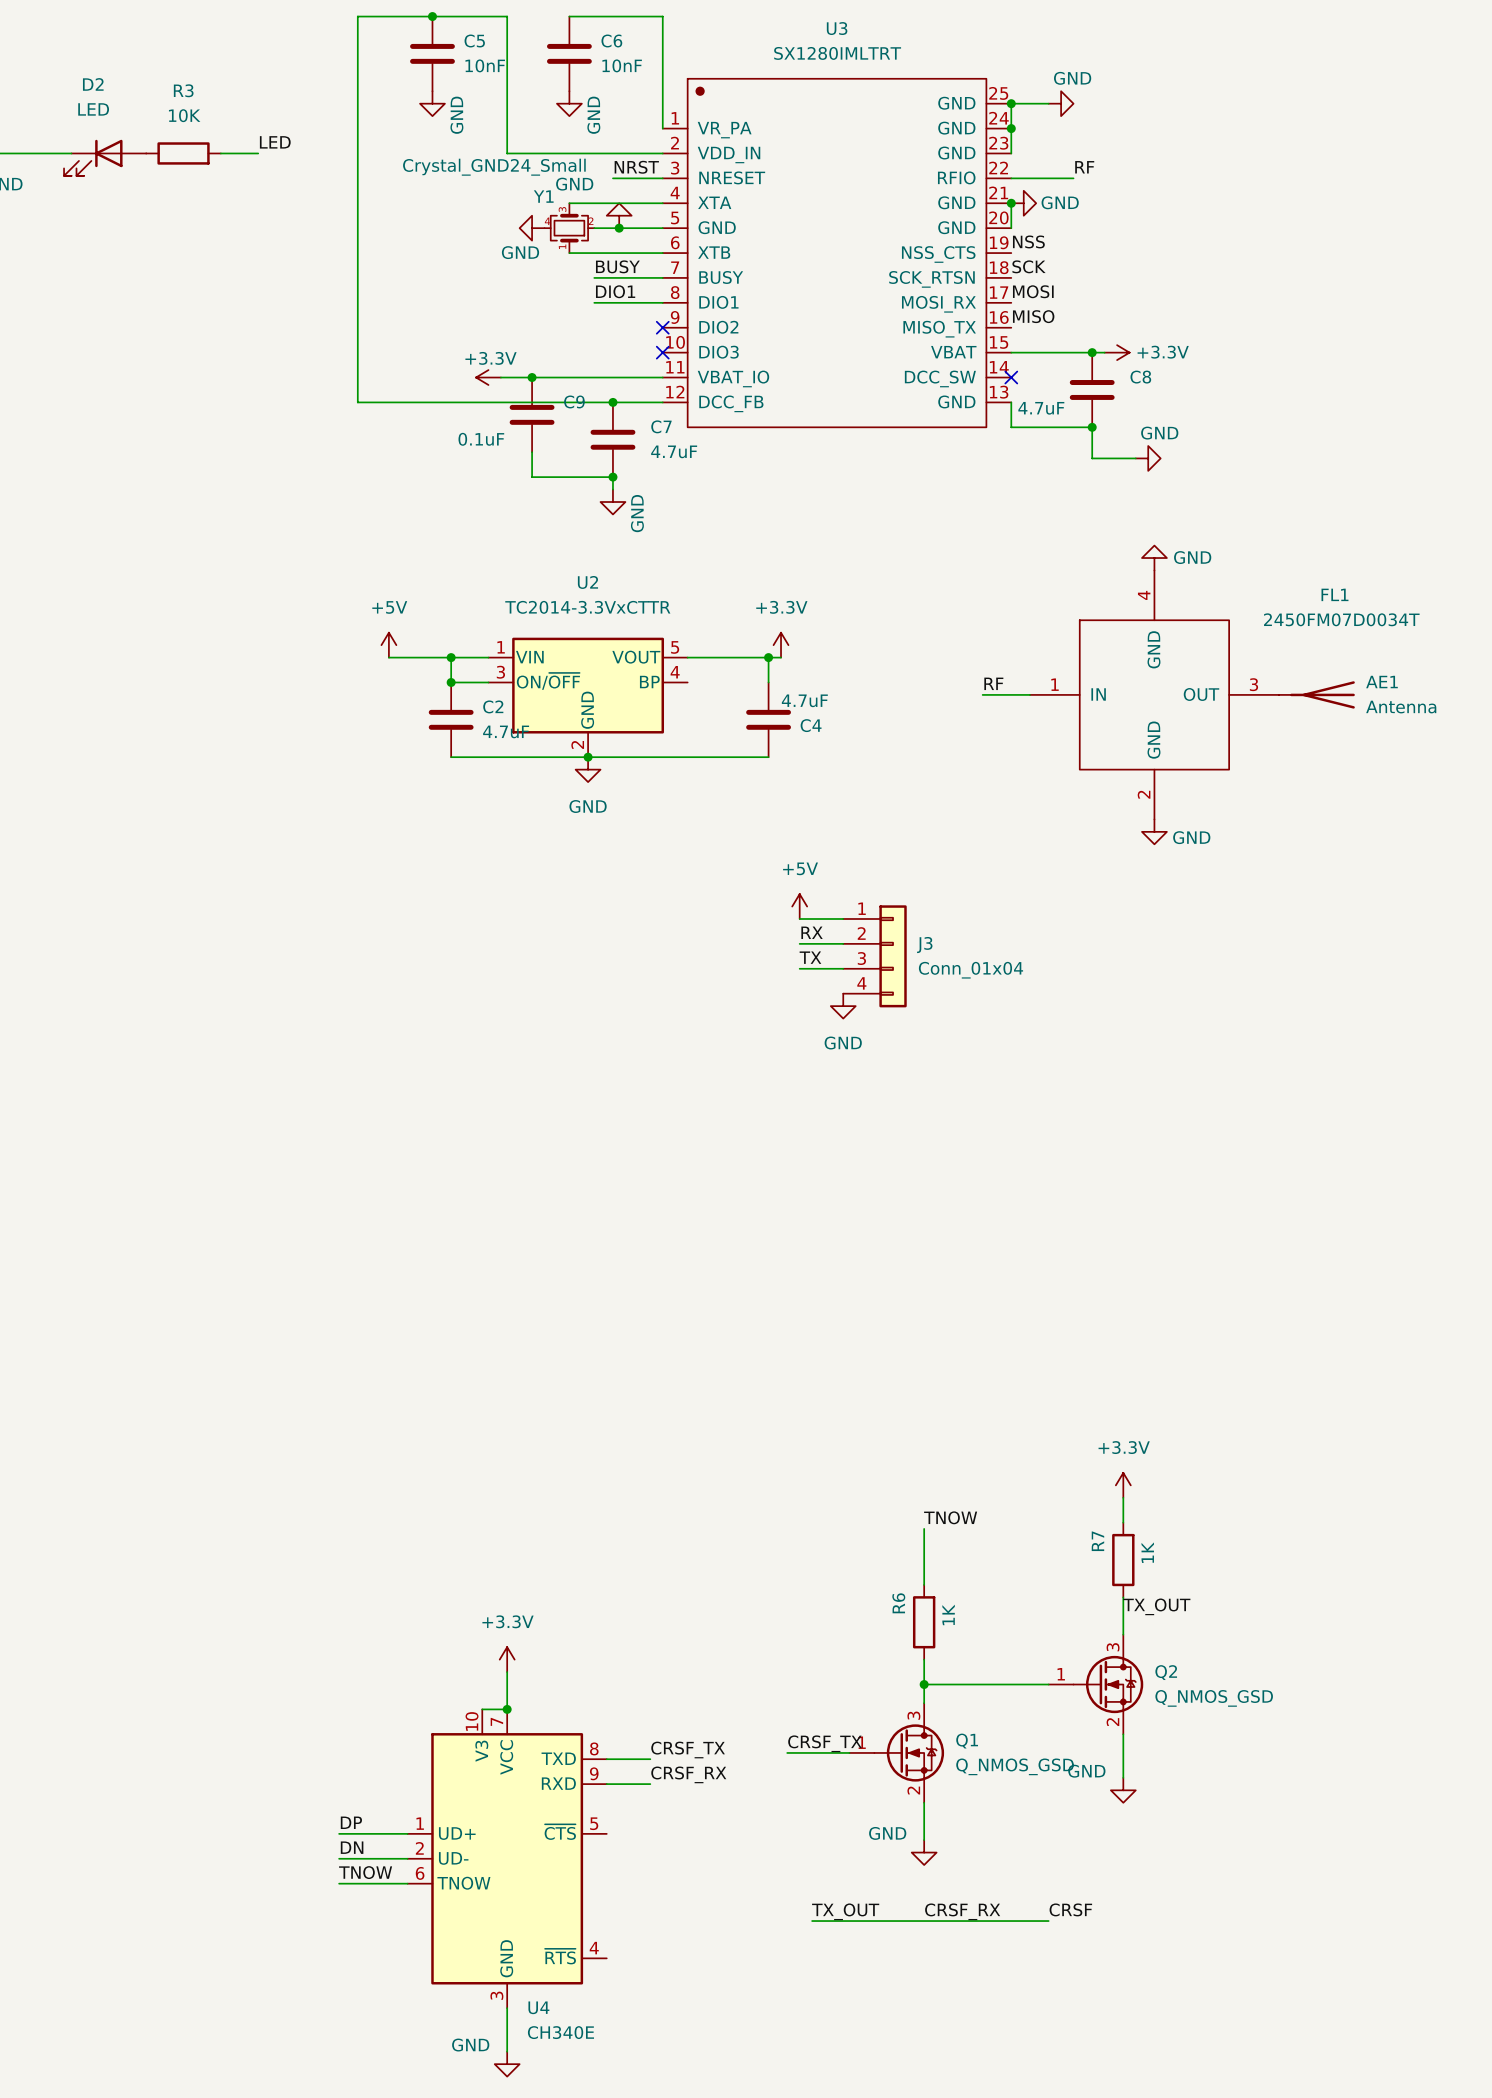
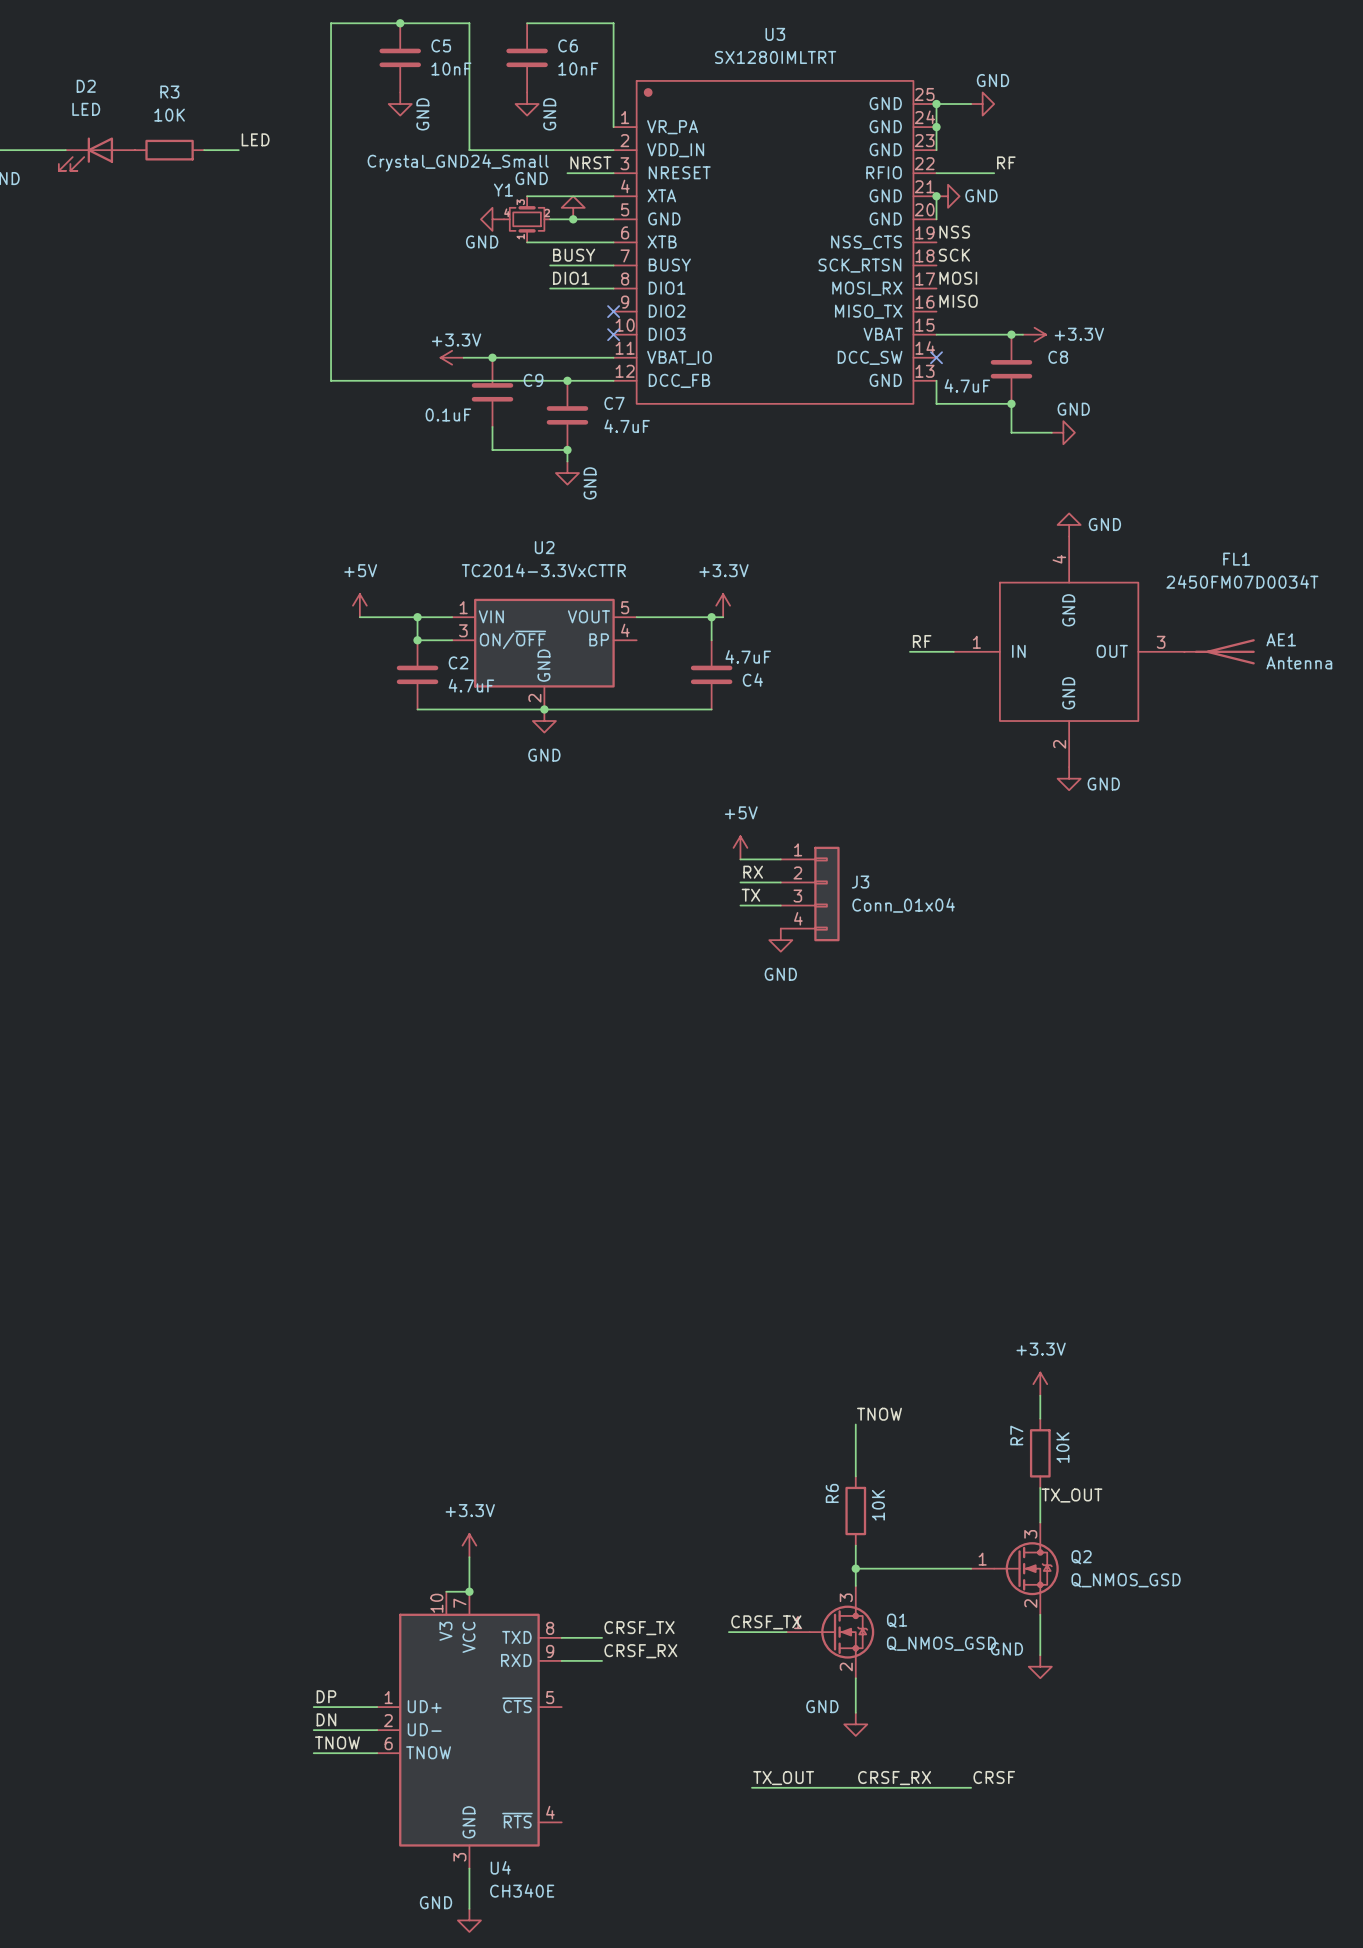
R7 value: 1K (1147, 1552) -> 10K (1062, 1447)
R6 value: 1K (948, 1614) -> 10K (878, 1505)

